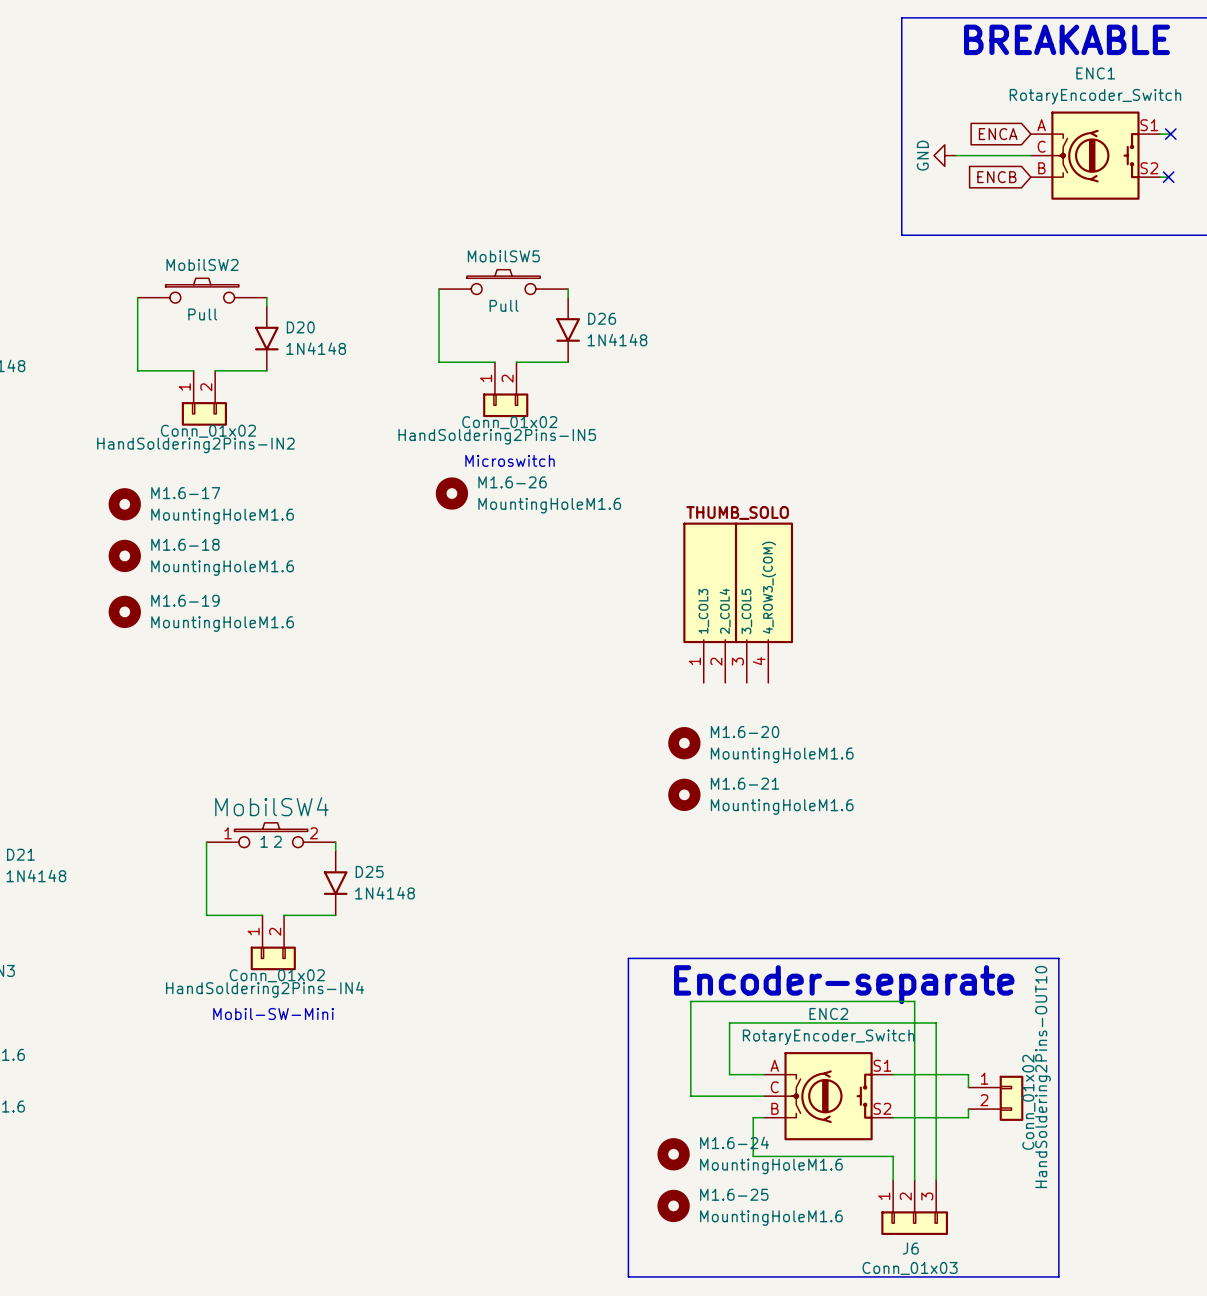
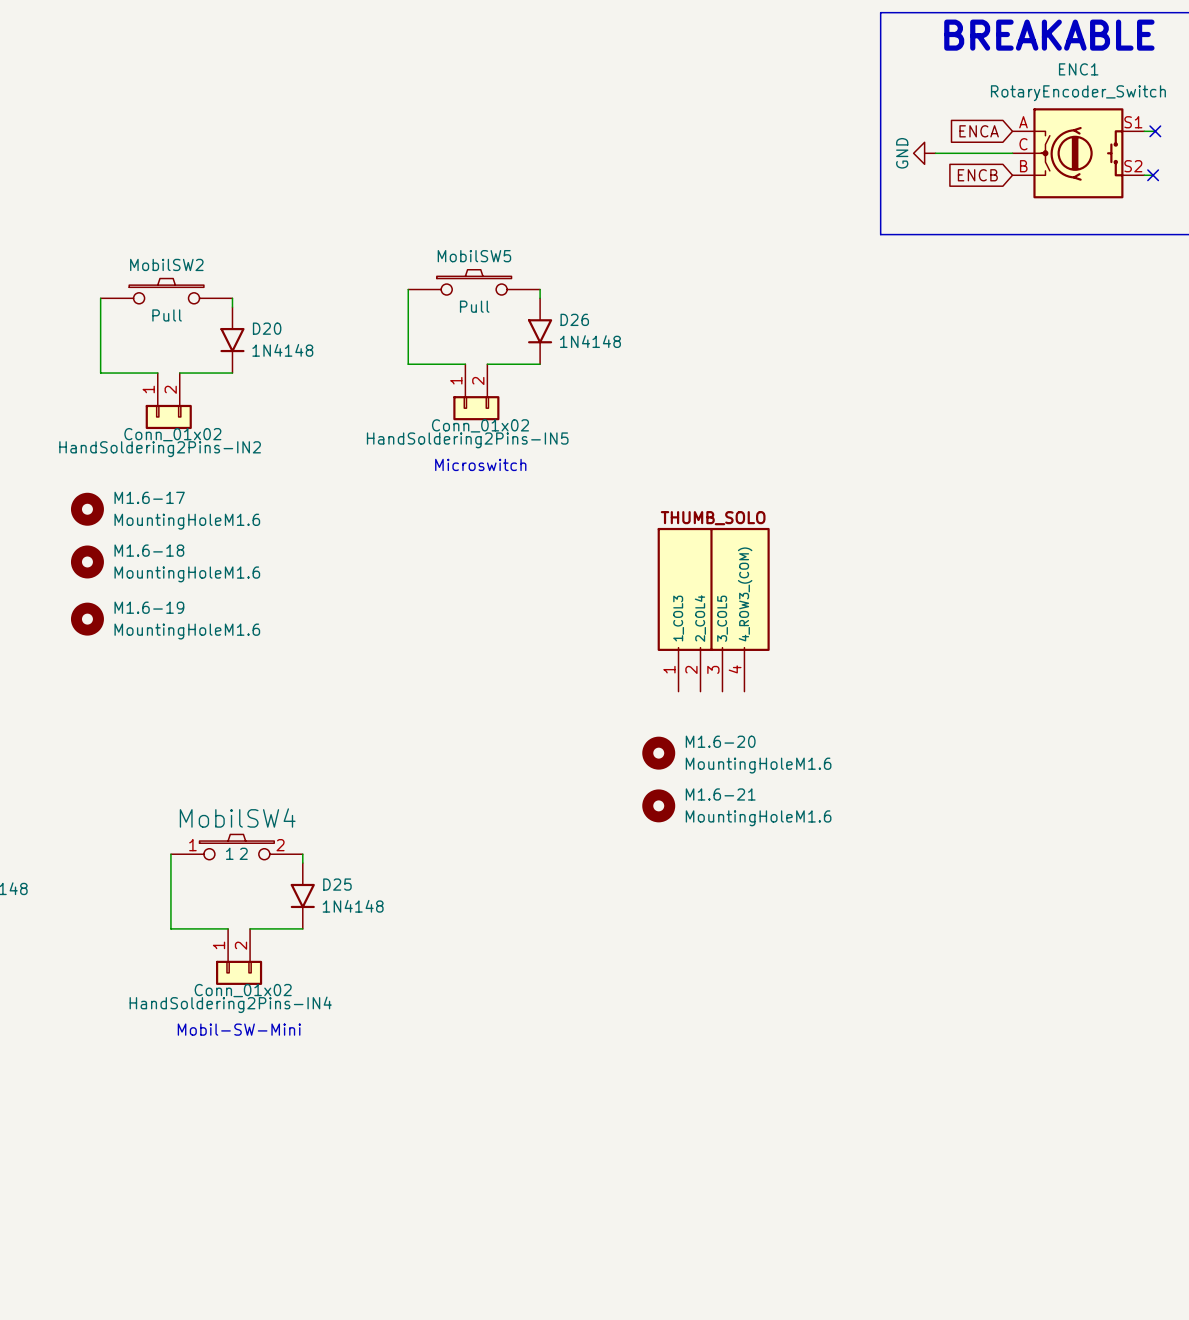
M1.6-26: MountingHoleM1.6 (451, 493) -> none
line: (628, 958) (1058, 958) (1058, 1276) (628, 1276) (628, 958) -> none
text: Encoder-separate (844, 984) -> none
wire: (764, 1074) (729, 1074) (729, 1022) (936, 1022) (936, 1180) -> none
wire: (893, 1074) (968, 1074) (968, 1087) -> none
wire: (764, 1096) (690, 1096) (690, 1001) (914, 1001) (914, 1180) -> none
ENC2: RotaryEncoder_Switch (828, 1096) -> none
HandSoldering2Pins-OUT10: Conn_01x02 (995, 1098) -> none
wire: (968, 1109) (968, 1117) (893, 1117) -> none
wire: (764, 1117) (753, 1117) (753, 1156) (893, 1156) (893, 1180) -> none
M1.6-24: MountingHoleM1.6 (673, 1154) -> none
M1.6-25: MountingHoleM1.6 (673, 1205) -> none
J6: Conn_01x03 (914, 1207) -> none

